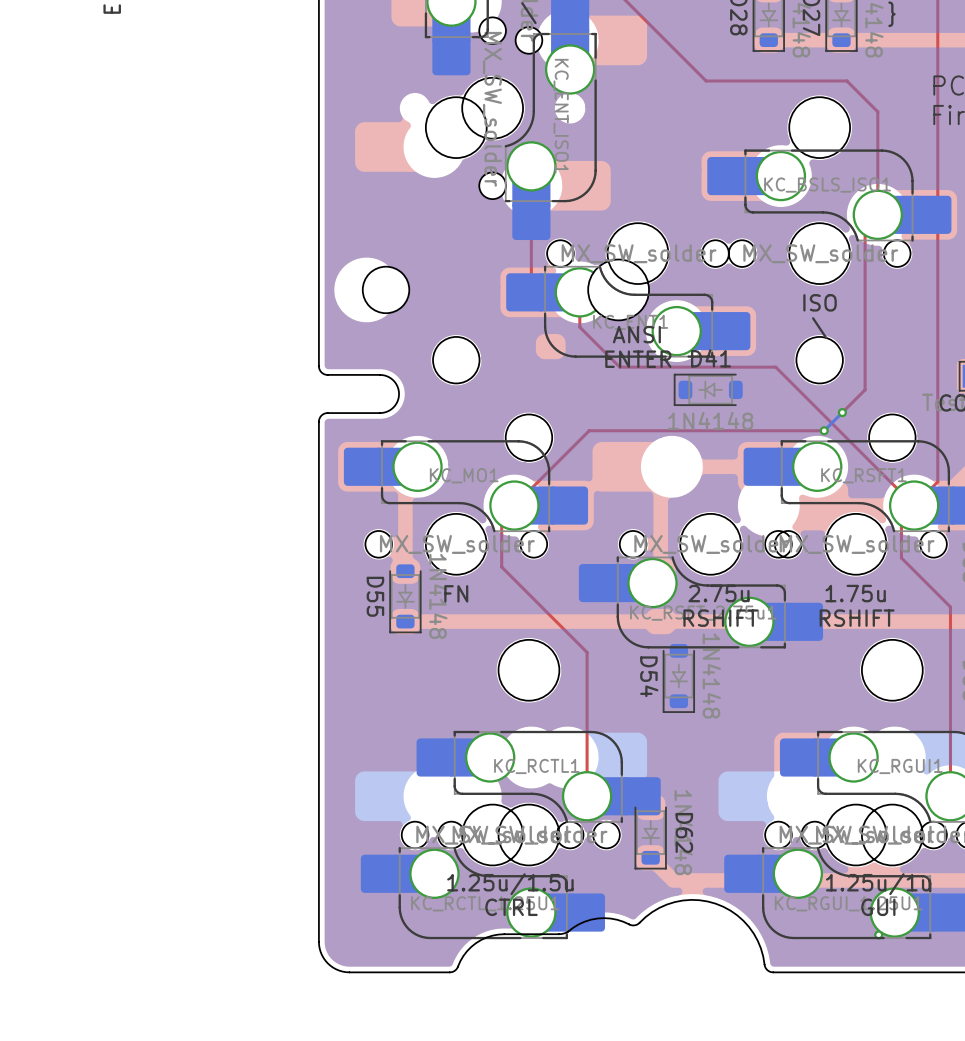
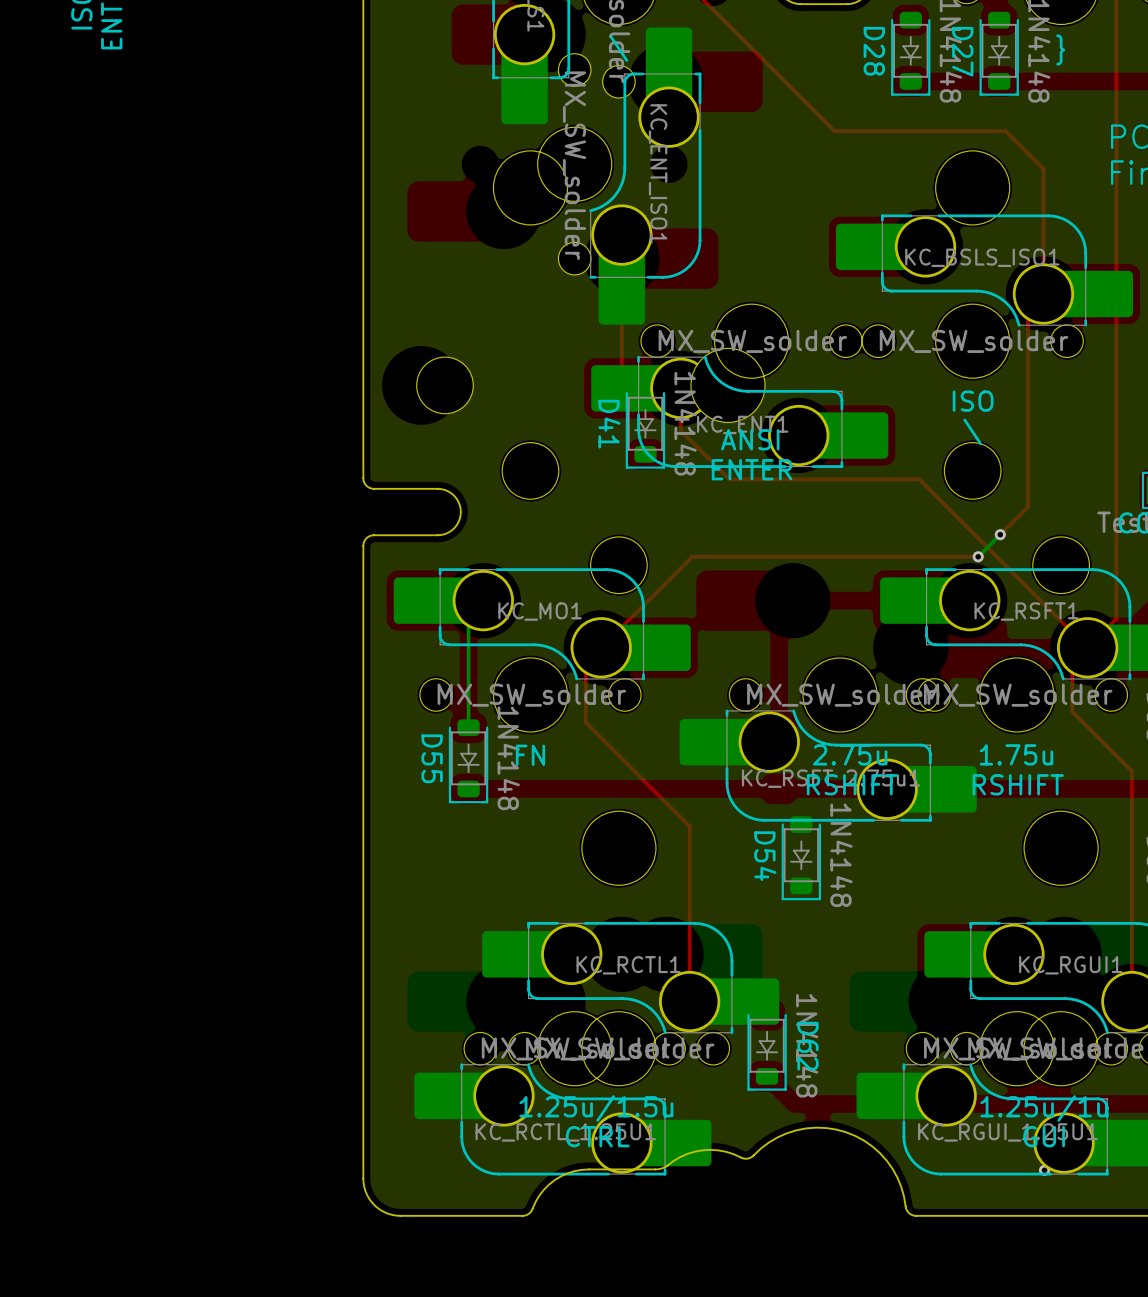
D41 rotation: 0° (708, 389) -> 90° counterclockwise (645, 426)
D41 position: (708, 389) -> (645, 426)
bottom track: none -> (468, 615) (468, 727)

